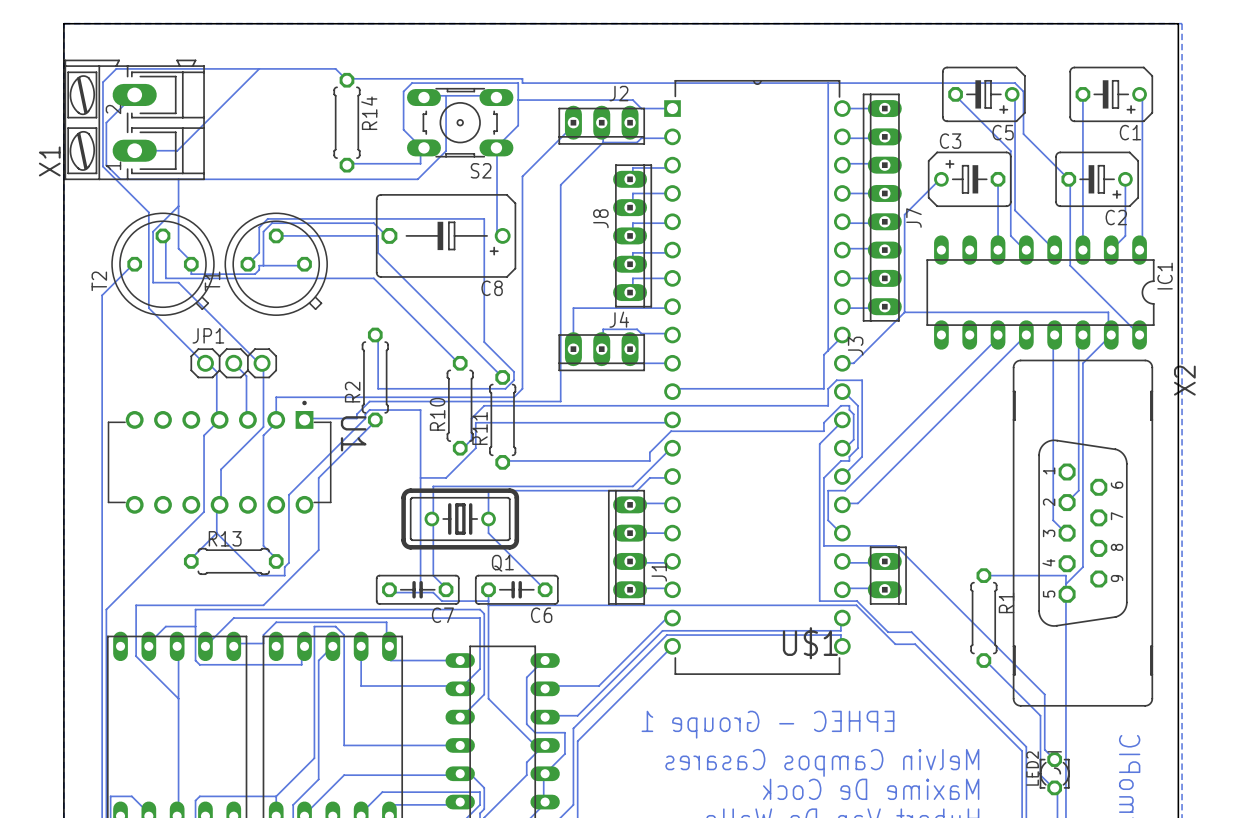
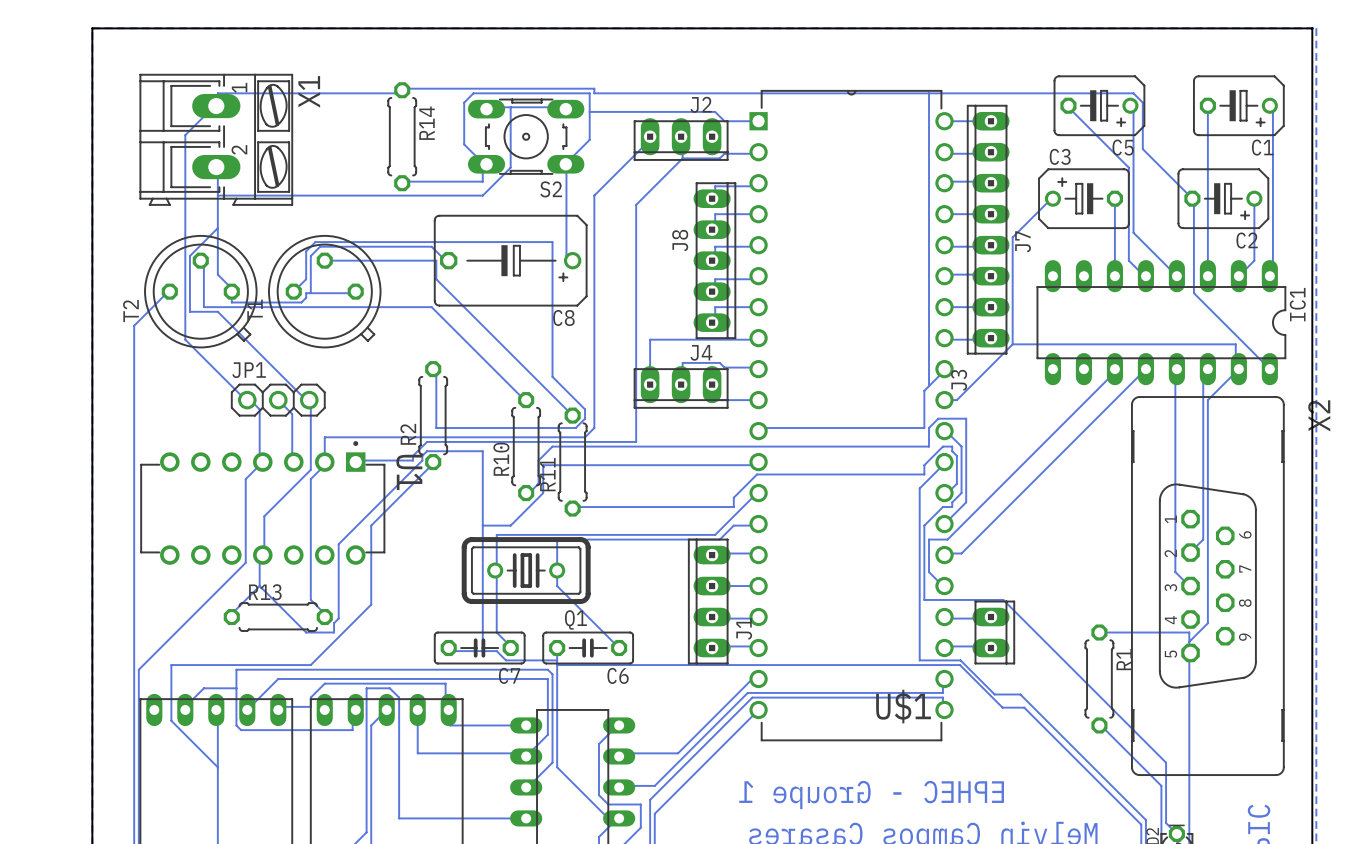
X1 footprint: [64, 59, 205, 181] -> [139, 73, 294, 206]
bottom track: (259, 68) (177, 151) (134, 150) -> none
bottom track: (346, 80) (335, 68) (116, 68) (102, 82) (102, 166) (148, 212) -> (402, 90) (399, 93) (217, 93) (216, 106) (185, 135) (185, 234)
bottom track: (134, 94) (106, 122) (106, 165) (120, 179) (417, 179) (420, 176) -> (217, 195) (482, 195)
bottom track: none -> (216, 167) (217, 167) (217, 198)
X1 name position: X1 (49, 161) -> X1 (309, 91)

